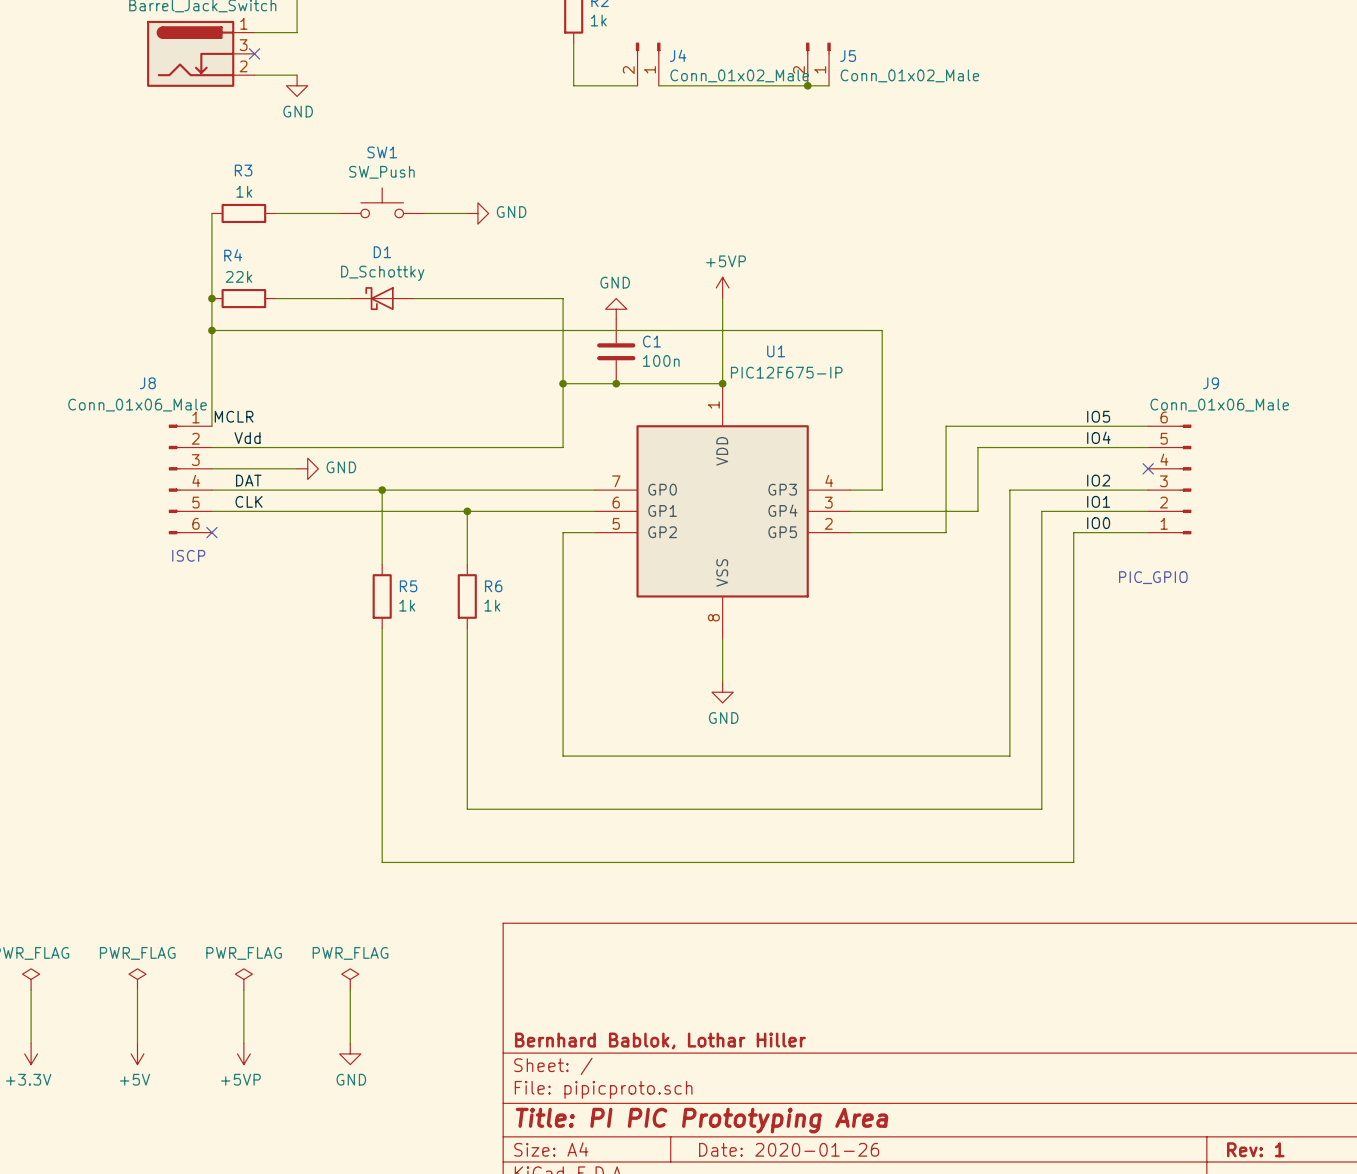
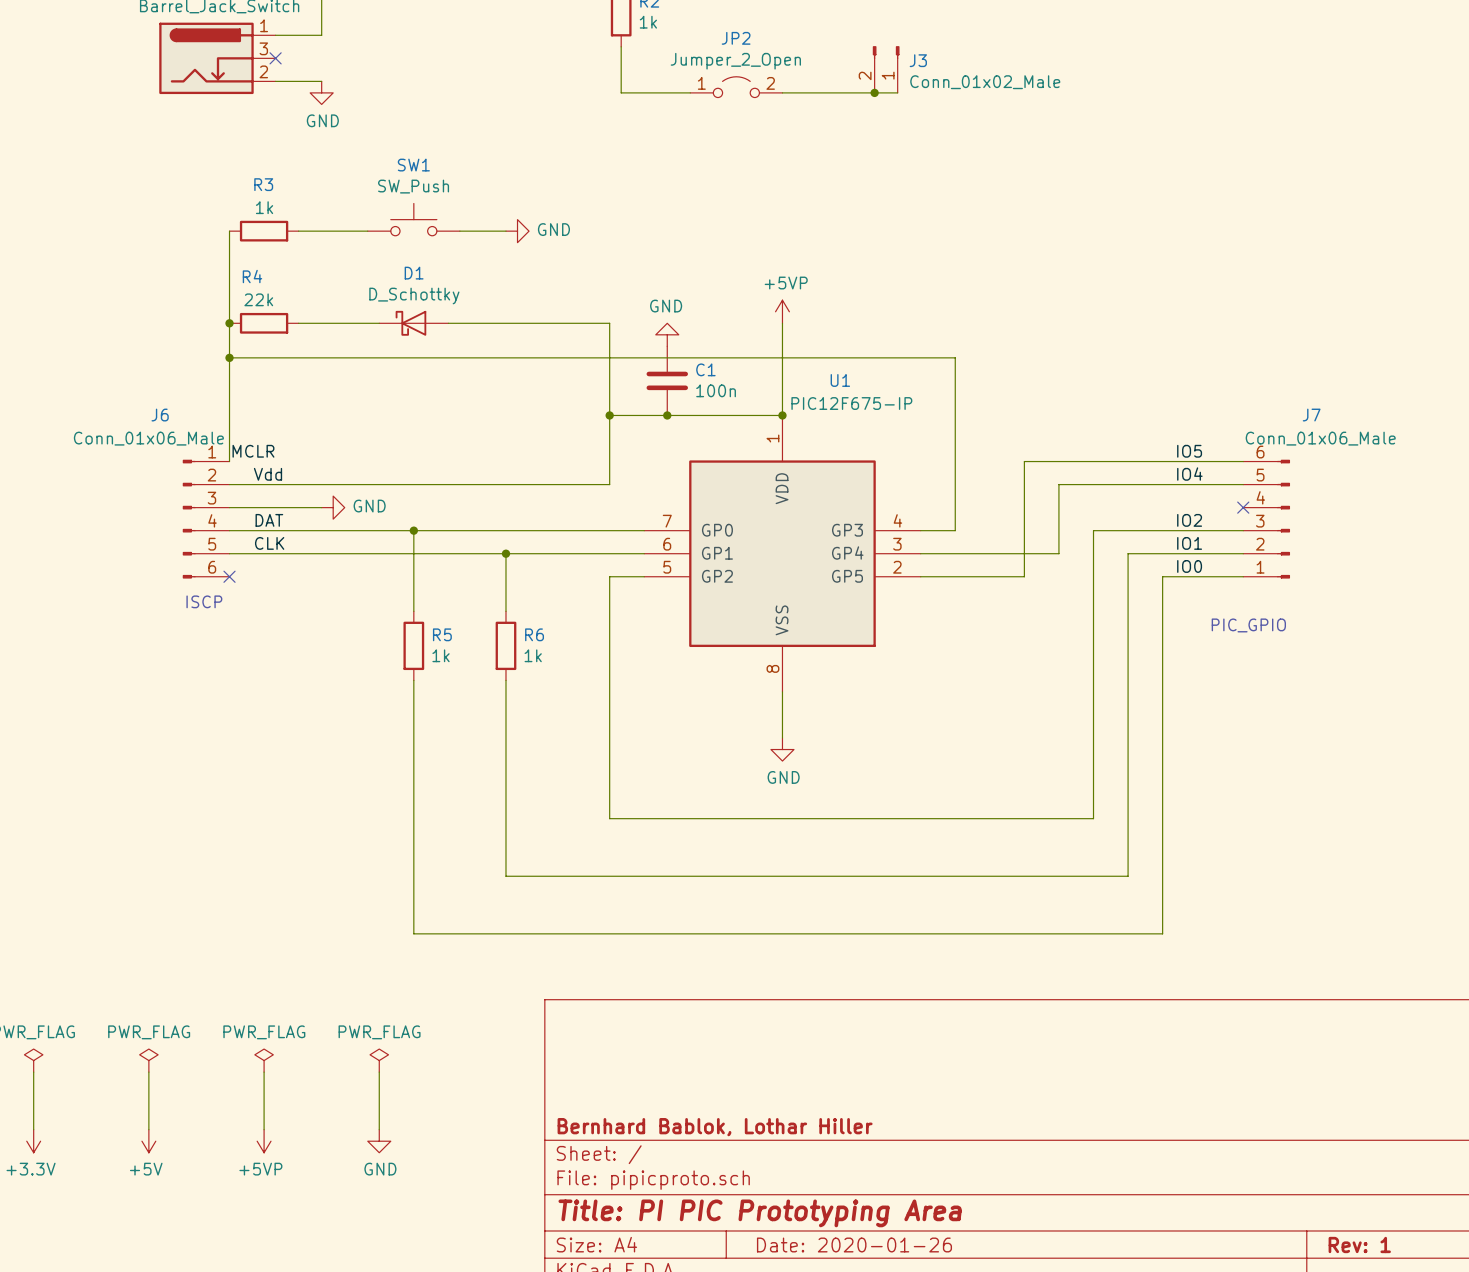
J5 name: J5 (848, 56) -> J3 (918, 60)
J4: Conn_01x02_Male (648, 64) -> none
JP2: none -> Jumper_2_Open (736, 87)
wire: (658, 85) (722, 85) -> none
J8 name: J8 (147, 383) -> J6 (160, 415)
J9 name: J9 (1211, 383) -> J7 (1311, 415)

